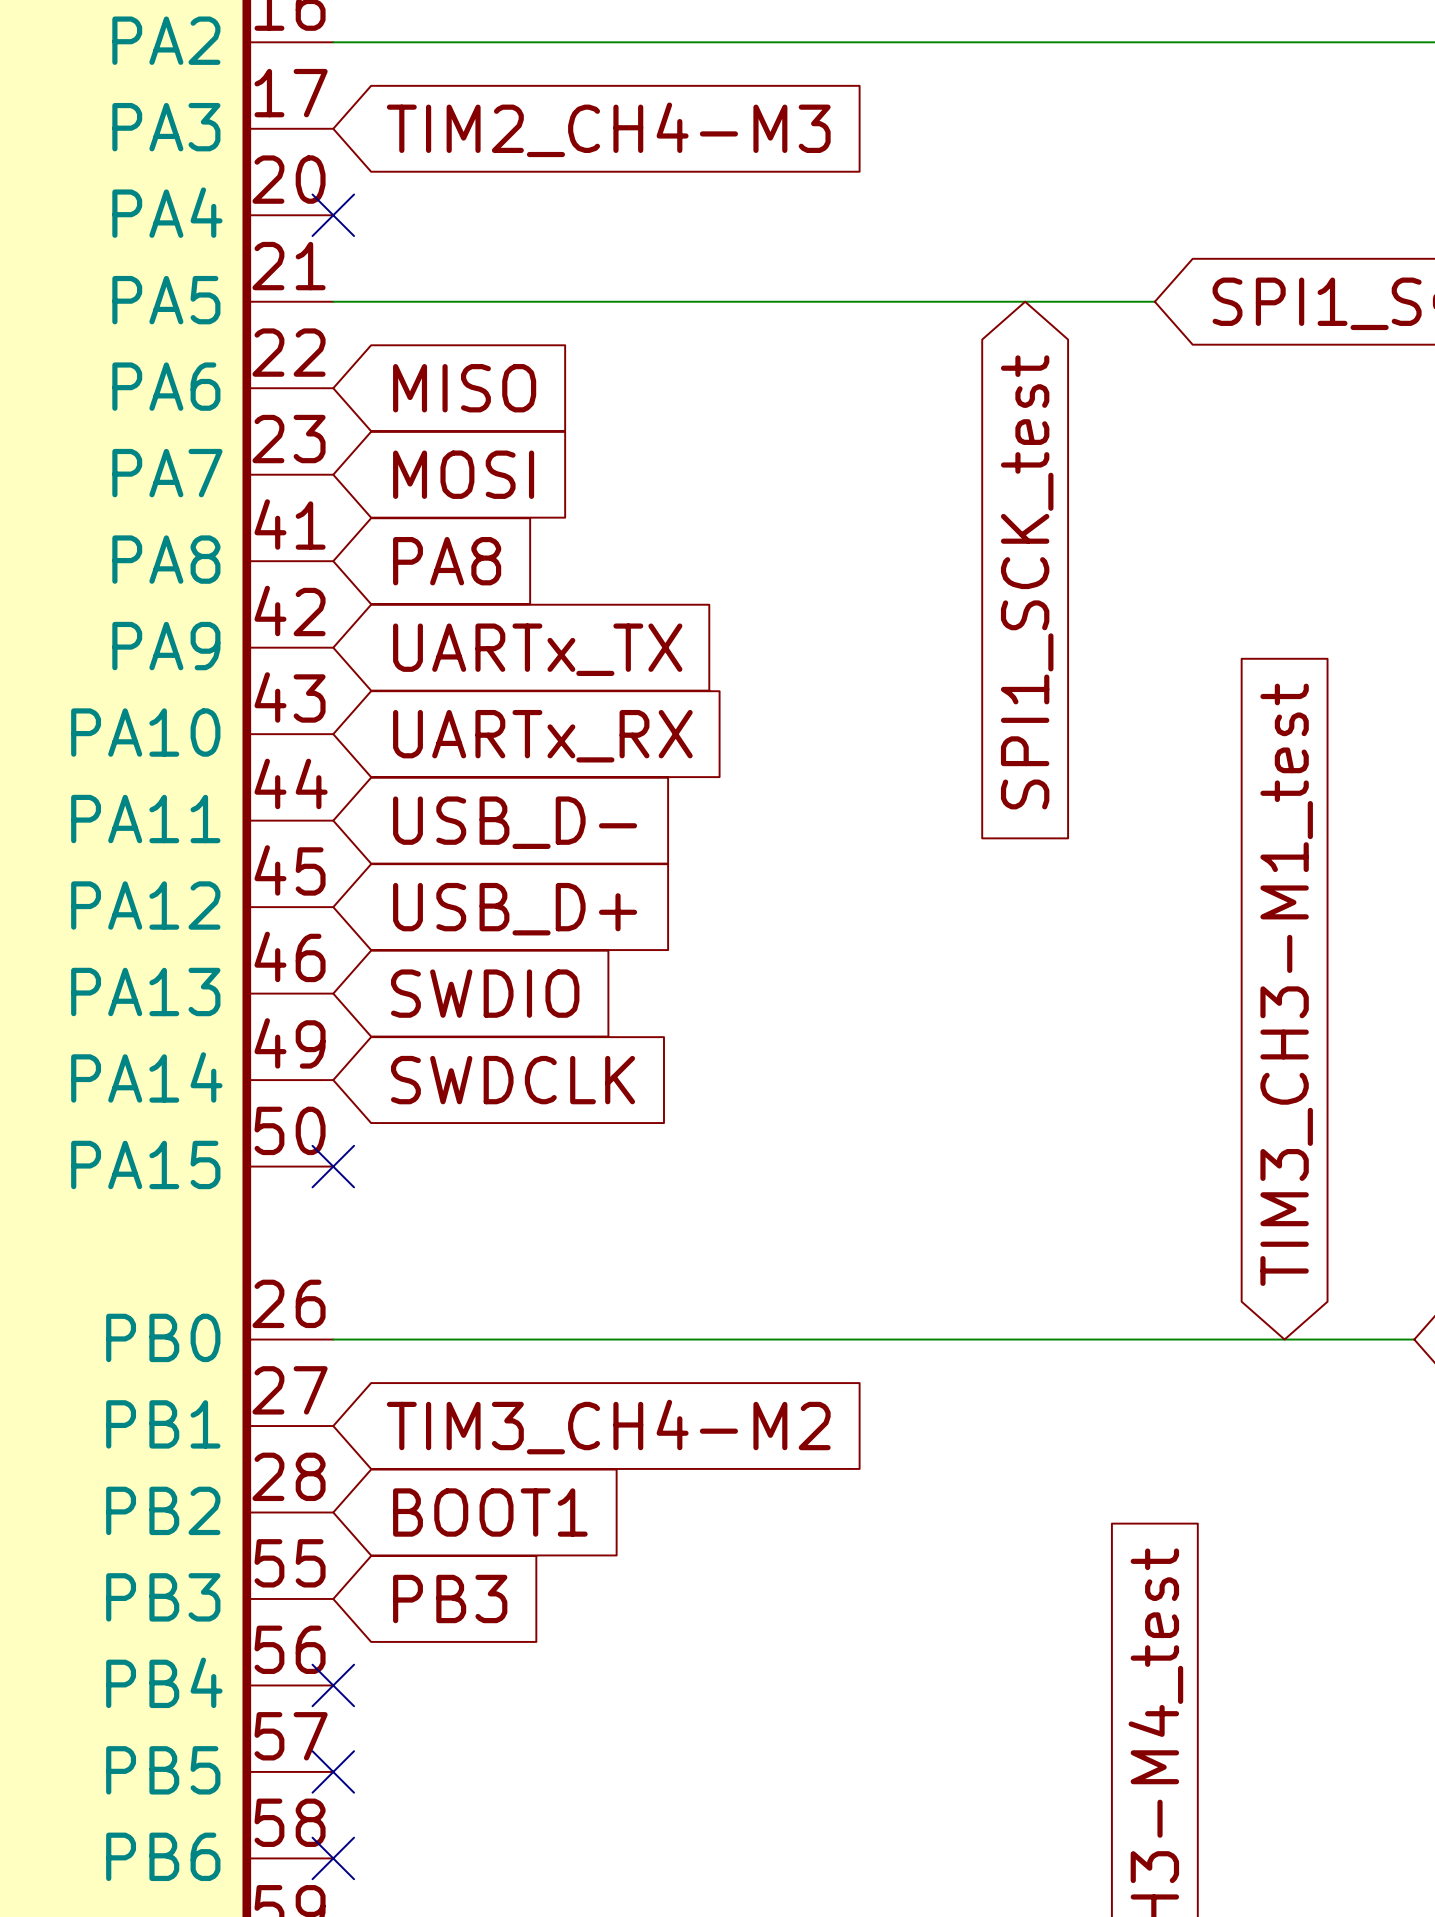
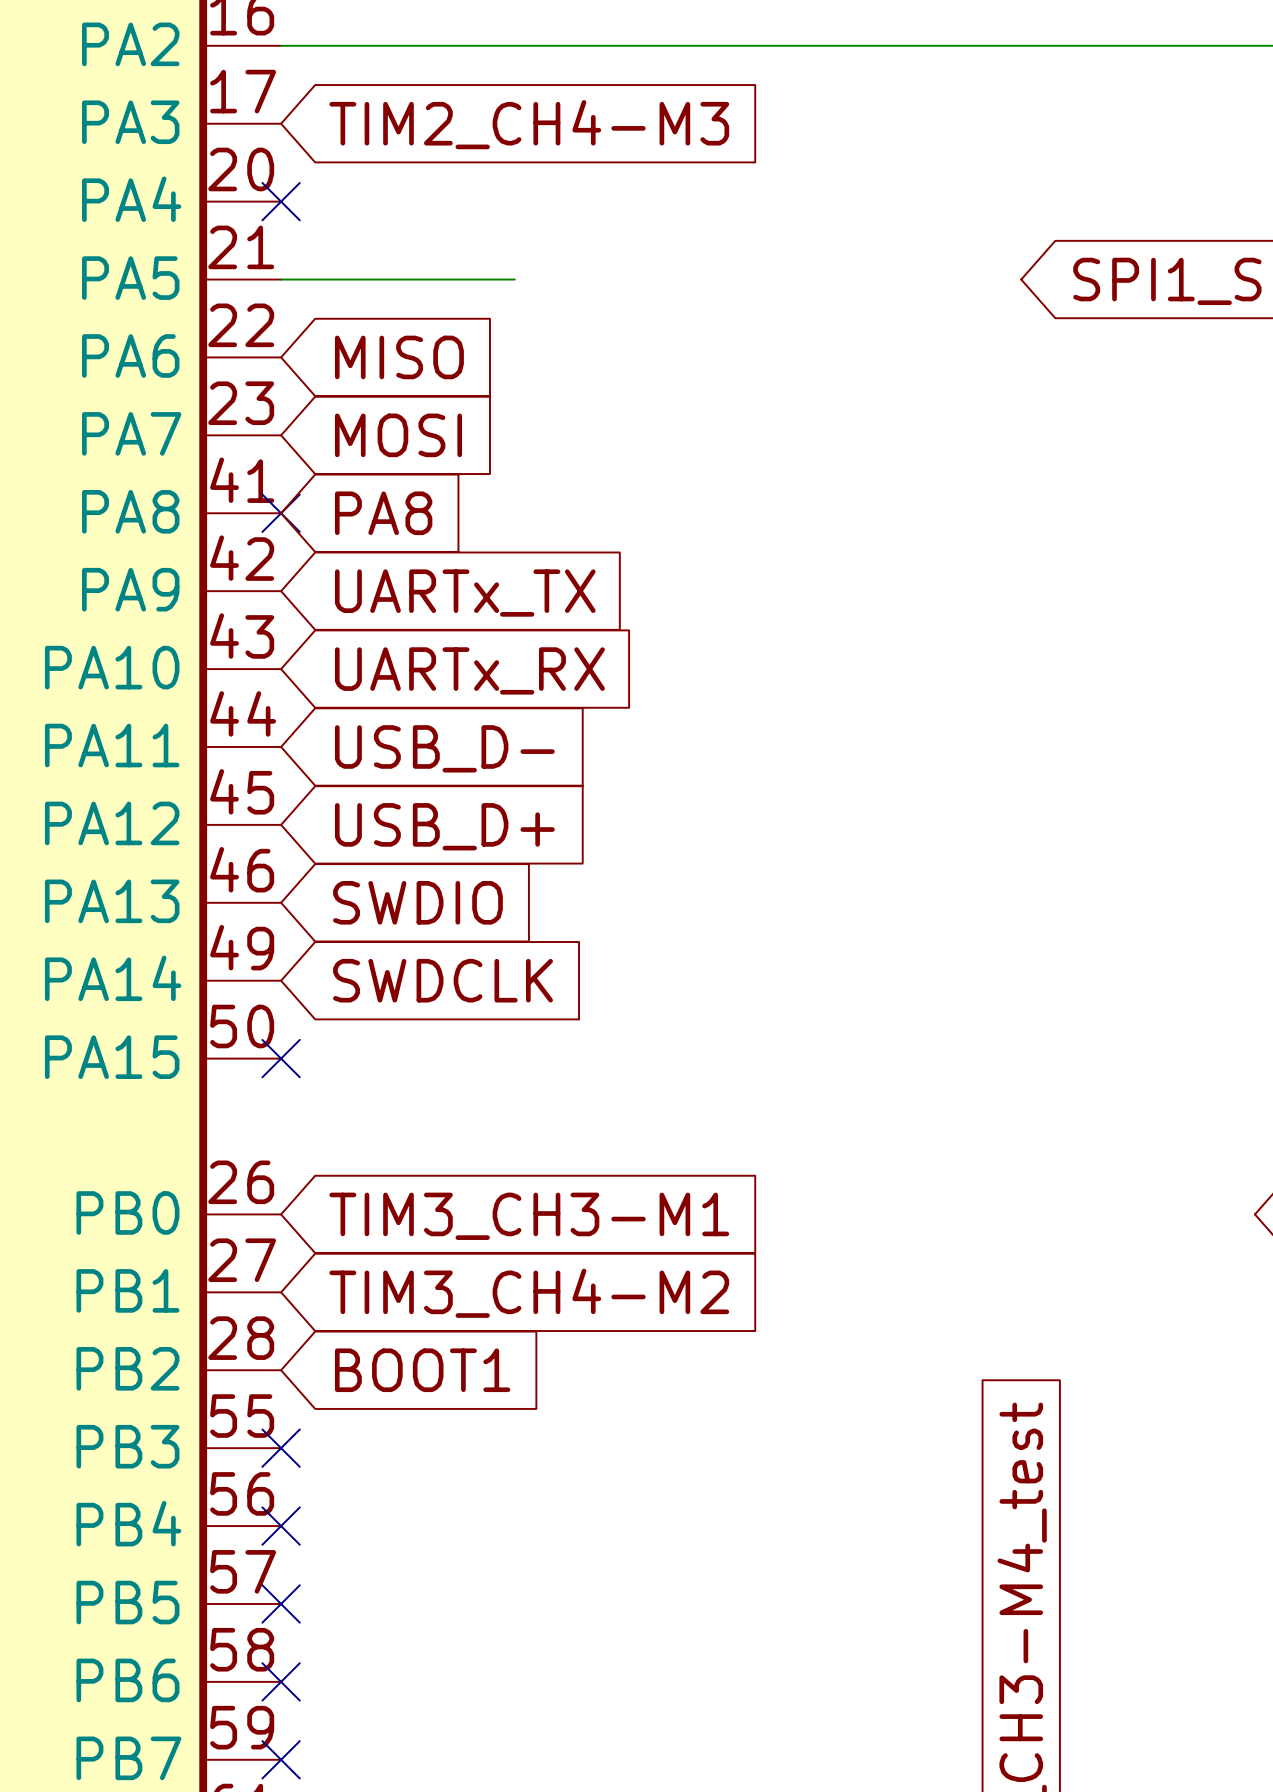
wire: (592, 301) (1154, 301) -> none
no-connect mark: none -> (281, 513)
global label: SPI1_SCK_test (1027, 582) -> none
global label: TIM3_CH3-M1_test (1286, 984) -> none
wire: (333, 1339) (1414, 1339) -> none
global label: none -> TIM3_CH3-M1 (529, 1216)
no-connect mark: none -> (281, 1448)
global label: PB3 (450, 1598) -> none

